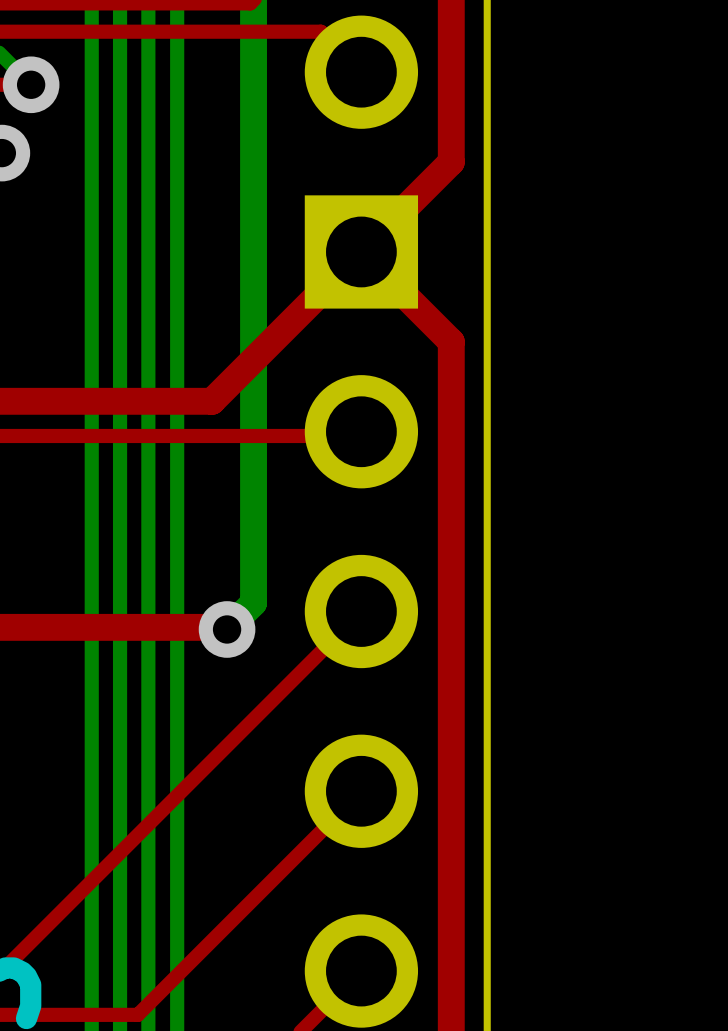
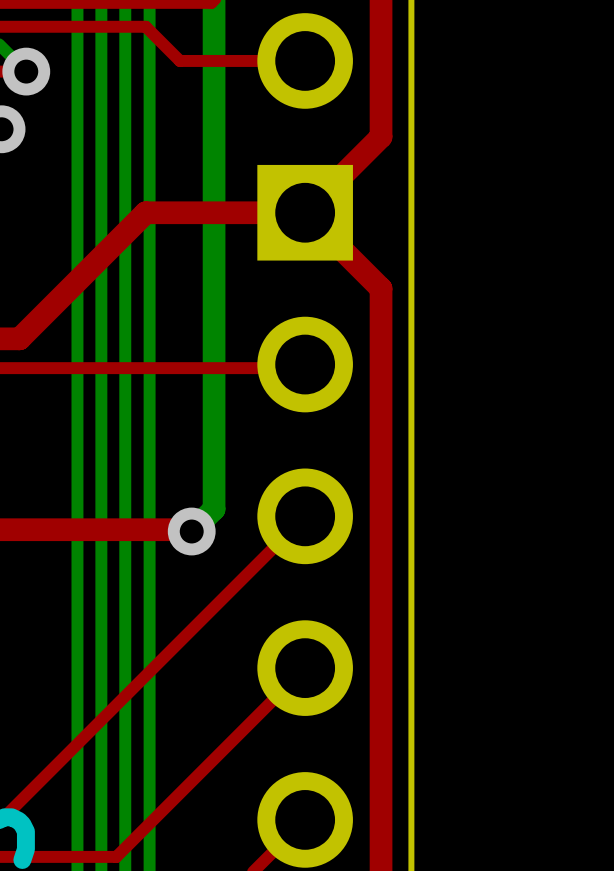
top track: (172, 31) (320, 31) (361, 72) -> (145, 26) (179, 60) (305, 60)
top track: (361, 251) (212, 401) (23, 401) -> (305, 212) (145, 212) (19, 338)

